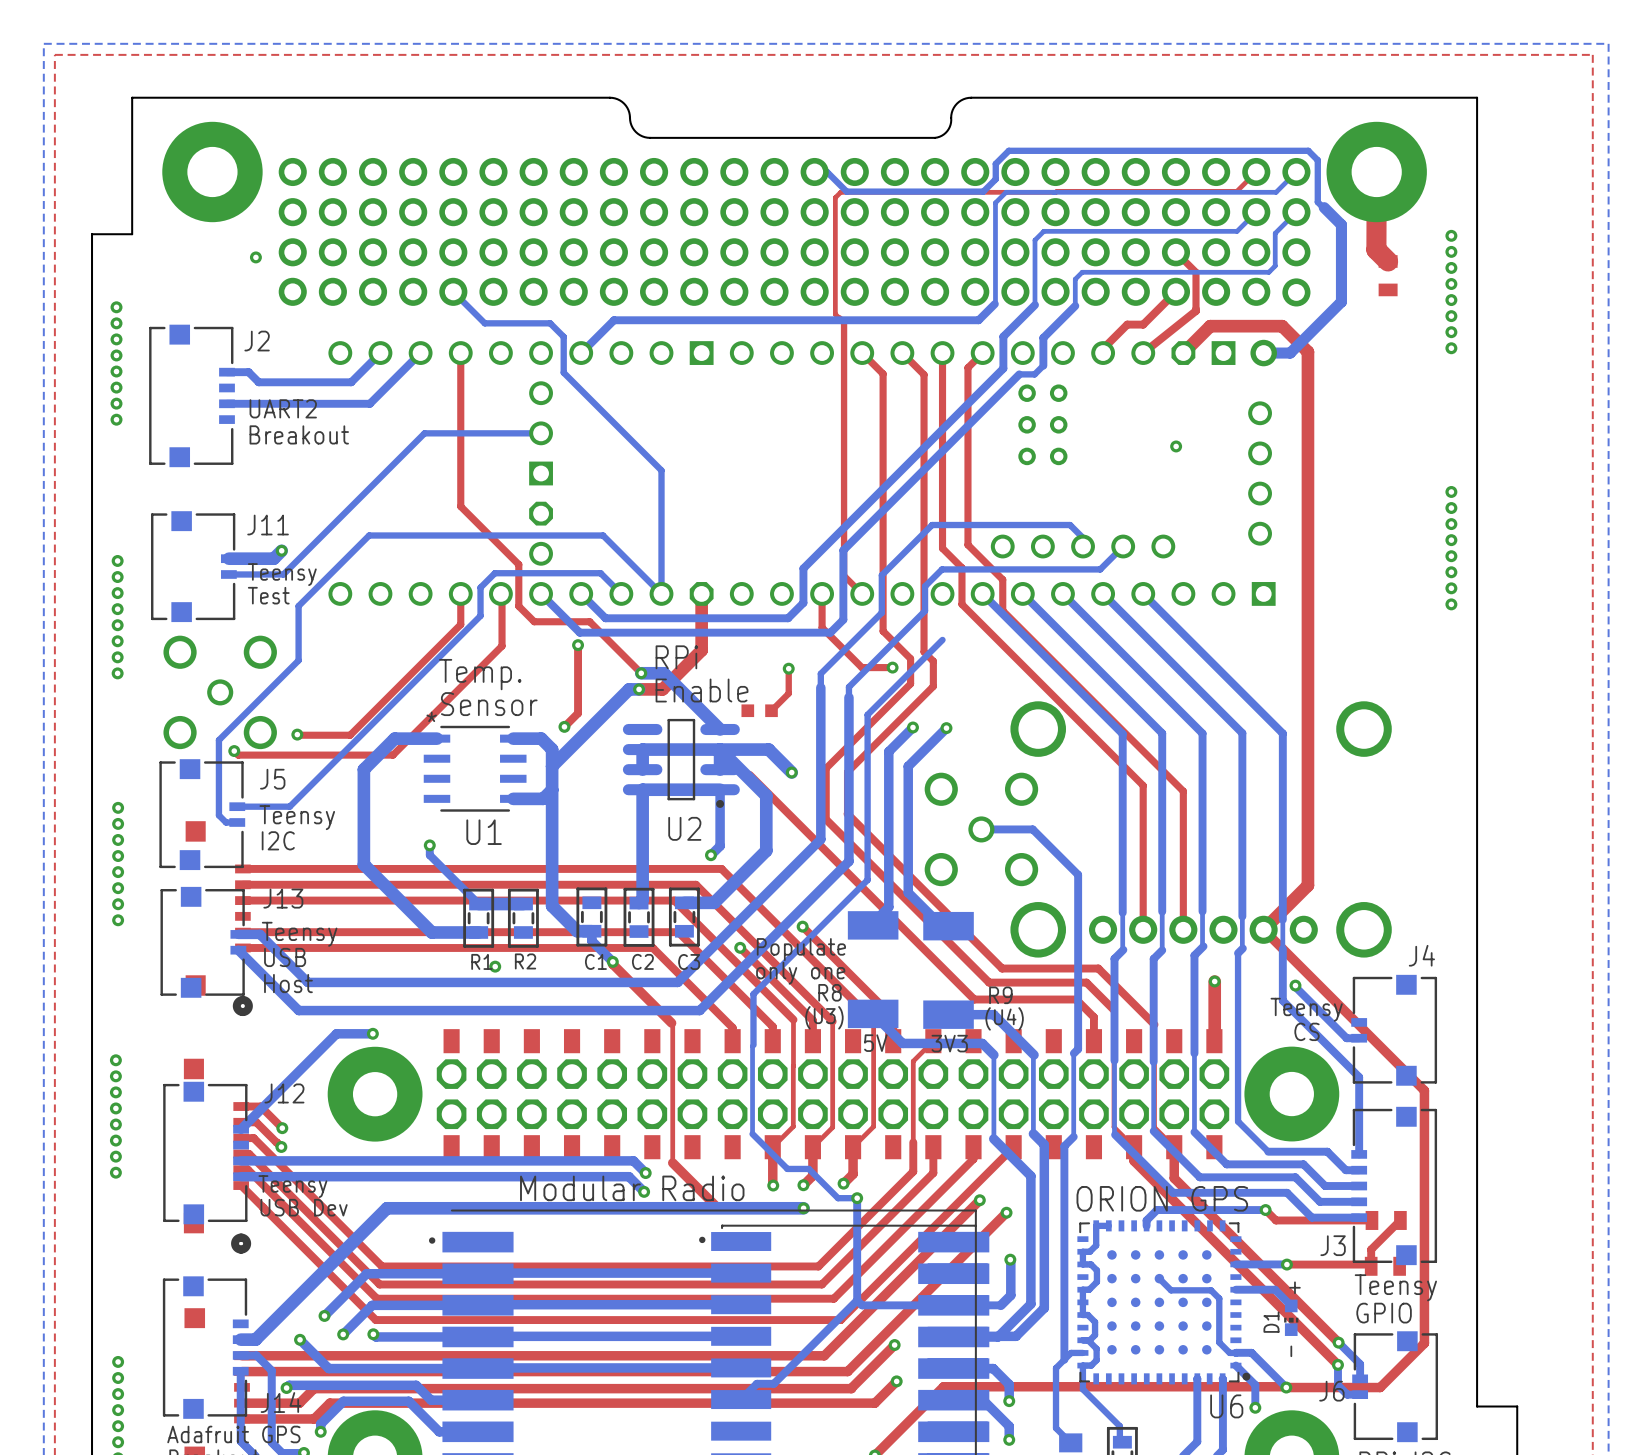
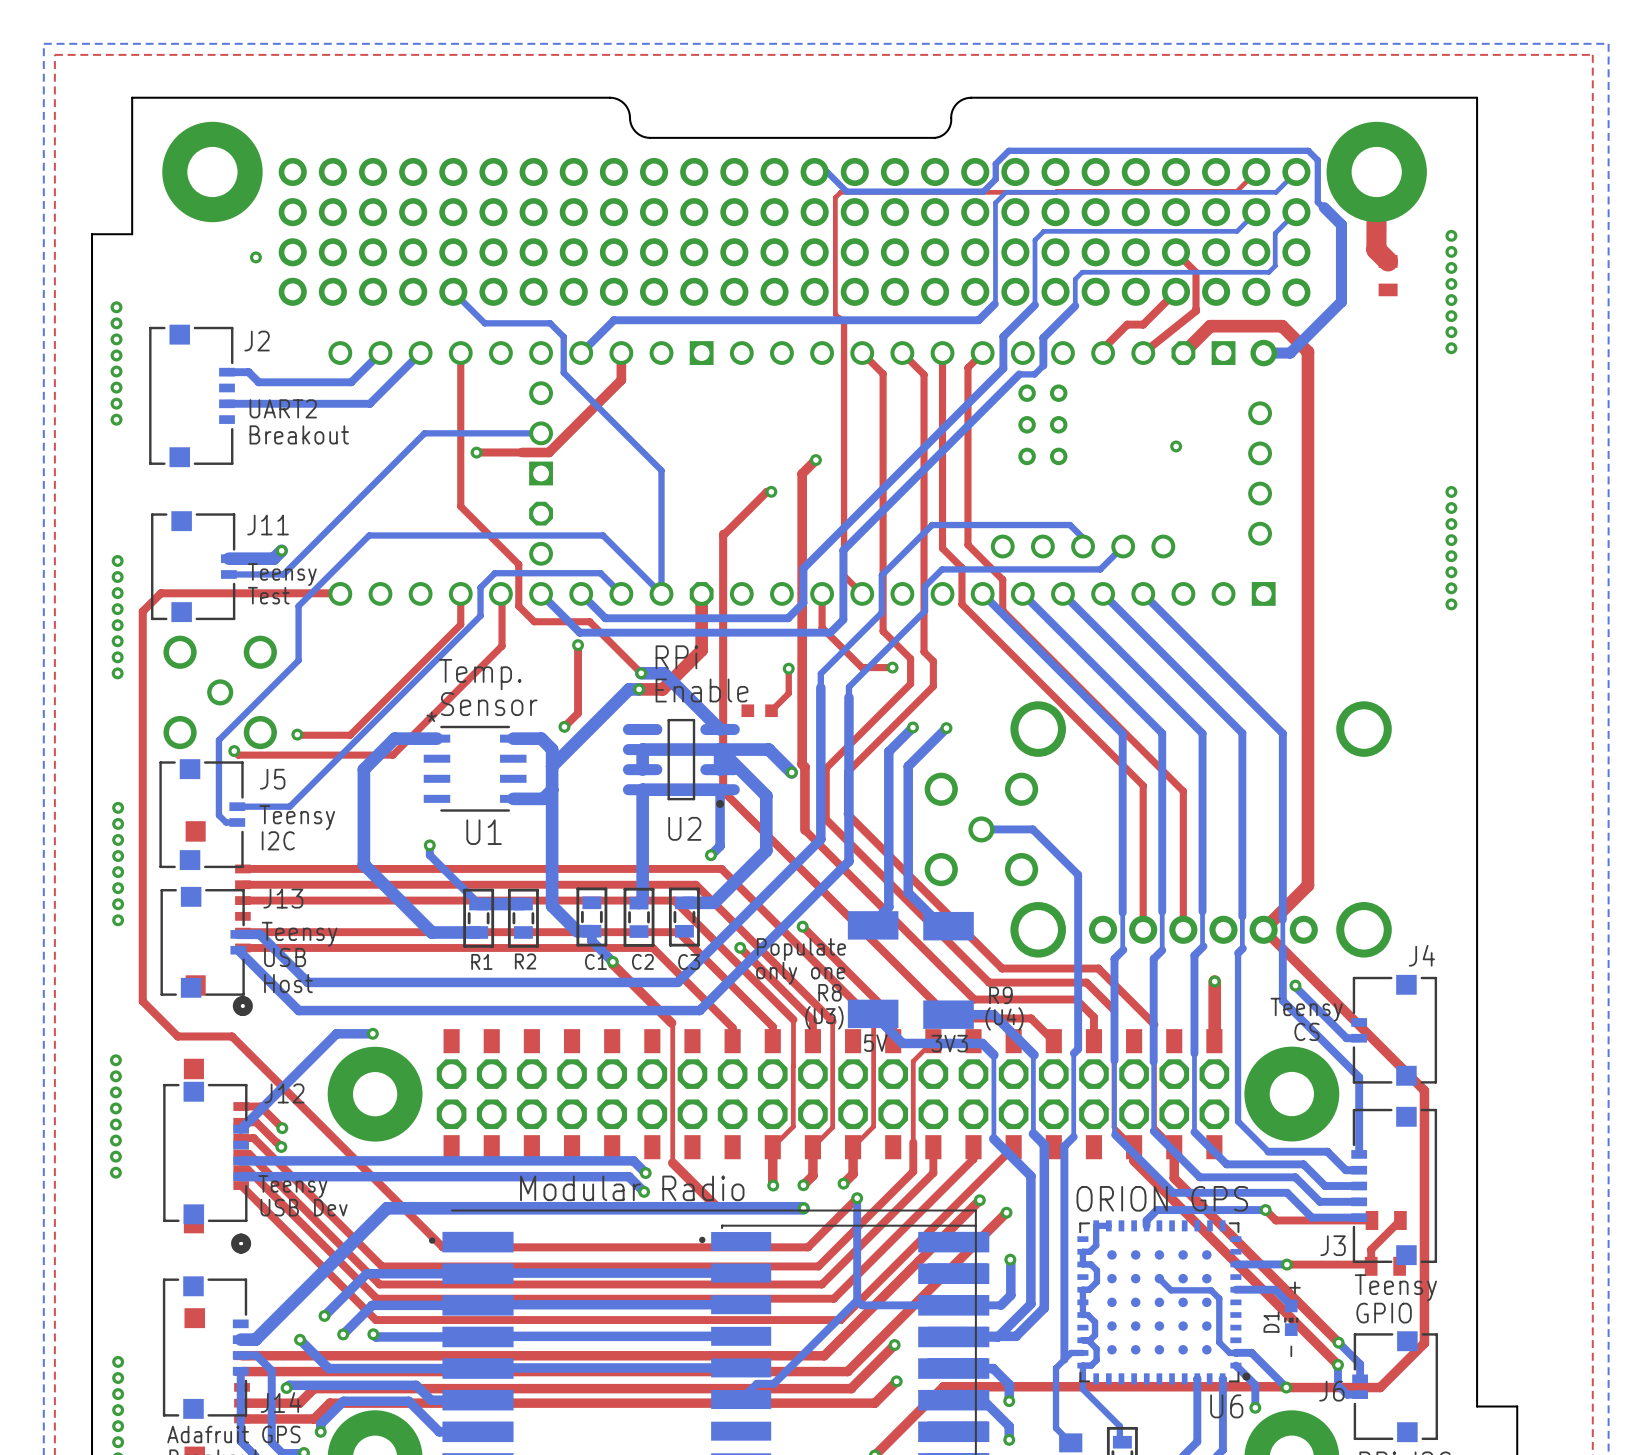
top track: none -> (621, 353) (621, 380) (548, 452) (476, 452)
via: none -> (476, 452)
via: none -> (815, 460)
top track: none -> (771, 491) (766, 491) (723, 535)
via: none -> (771, 491)
top track: none -> (723, 533) (723, 791) (950, 1018) (1031, 1018) (1053, 1041)
top track: none -> (340, 593) (160, 593) (142, 611) (142, 1001) (177, 1036) (232, 1036) (442, 1247) (808, 1247) (857, 1198)
bottom track: (942, 639) (867, 714) (867, 880) (753, 994) (753, 1045) -> none
top track: (749, 774) (804, 830) -> (815, 460) (802, 473) (802, 764) (804, 767) (804, 830)
via: (495, 966) -> none
bottom track: (753, 1044) (752, 1134) (787, 1168) (808, 1168) (838, 1198) (857, 1198) -> none

